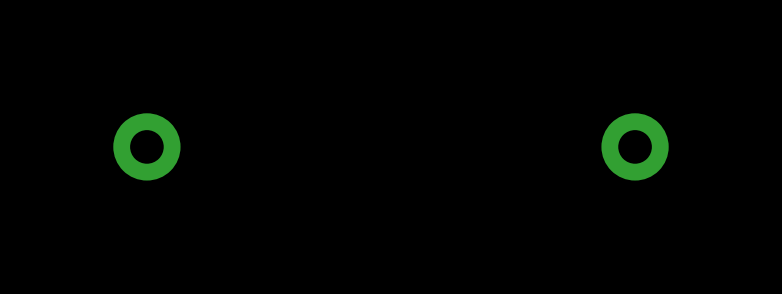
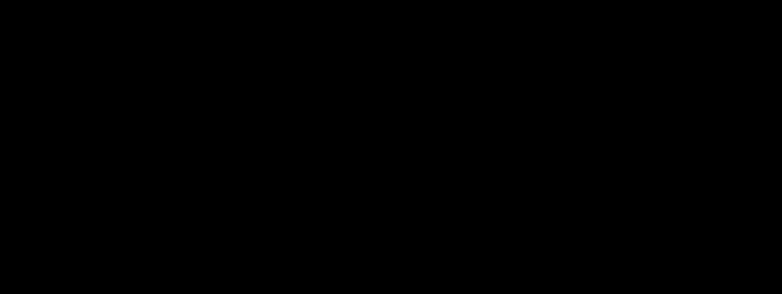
part: (146, 146) -> none
part: (635, 146) -> none

